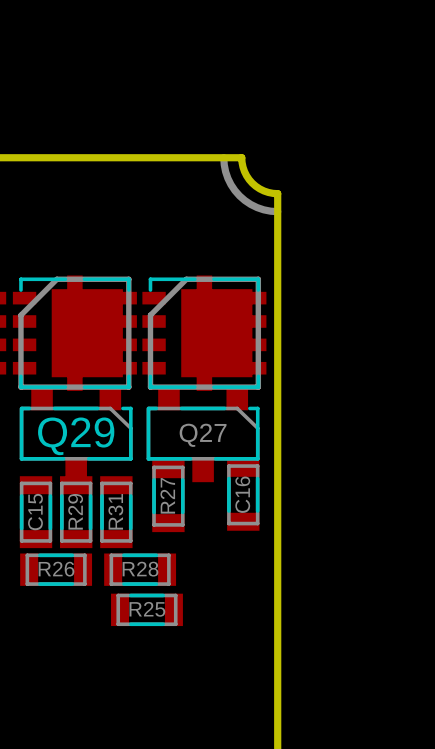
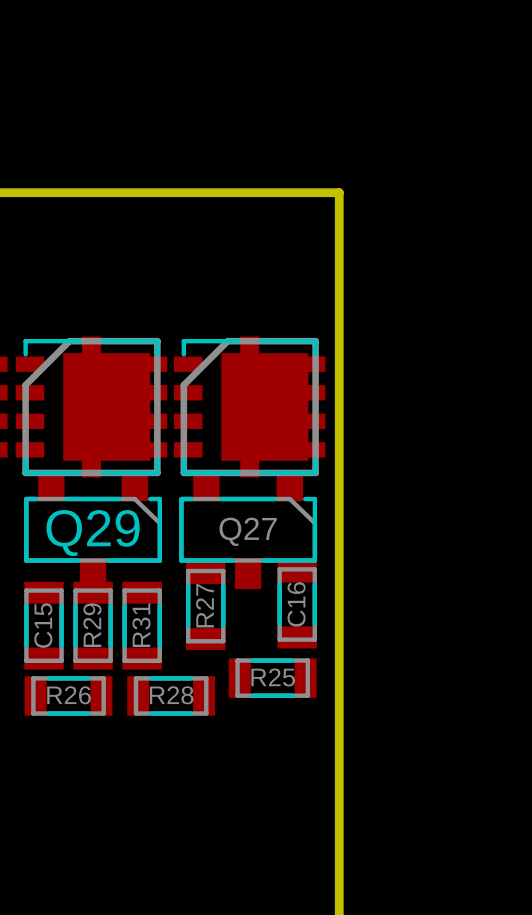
line: (223, 157) (227, 178) (239, 195) (257, 207) (277, 211) -> none
board edge: (241, 157) (244, 171) (252, 183) (263, 190) (277, 193) -> (295, 192) (339, 192) (339, 236)
R25 position: (146, 609) -> (272, 678)

